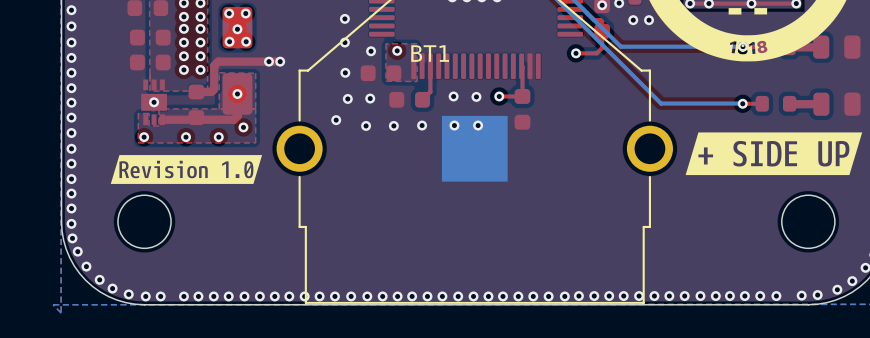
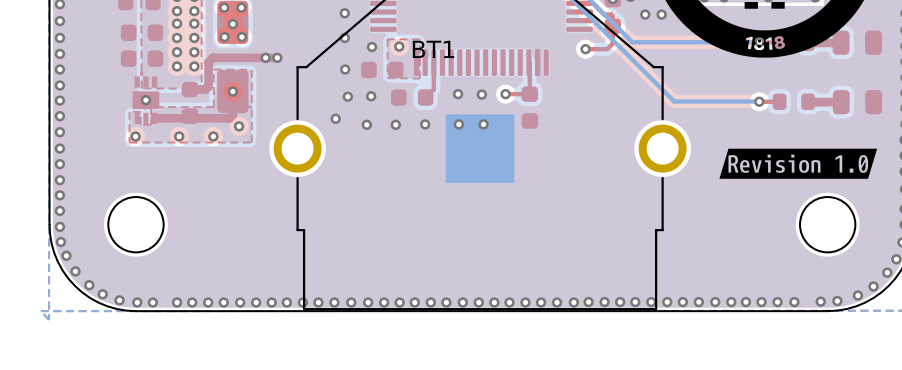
drawing shape: [685, 132, 863, 176] -> [719, 148, 878, 179]
drawing: [110, 155, 263, 184] -> none

